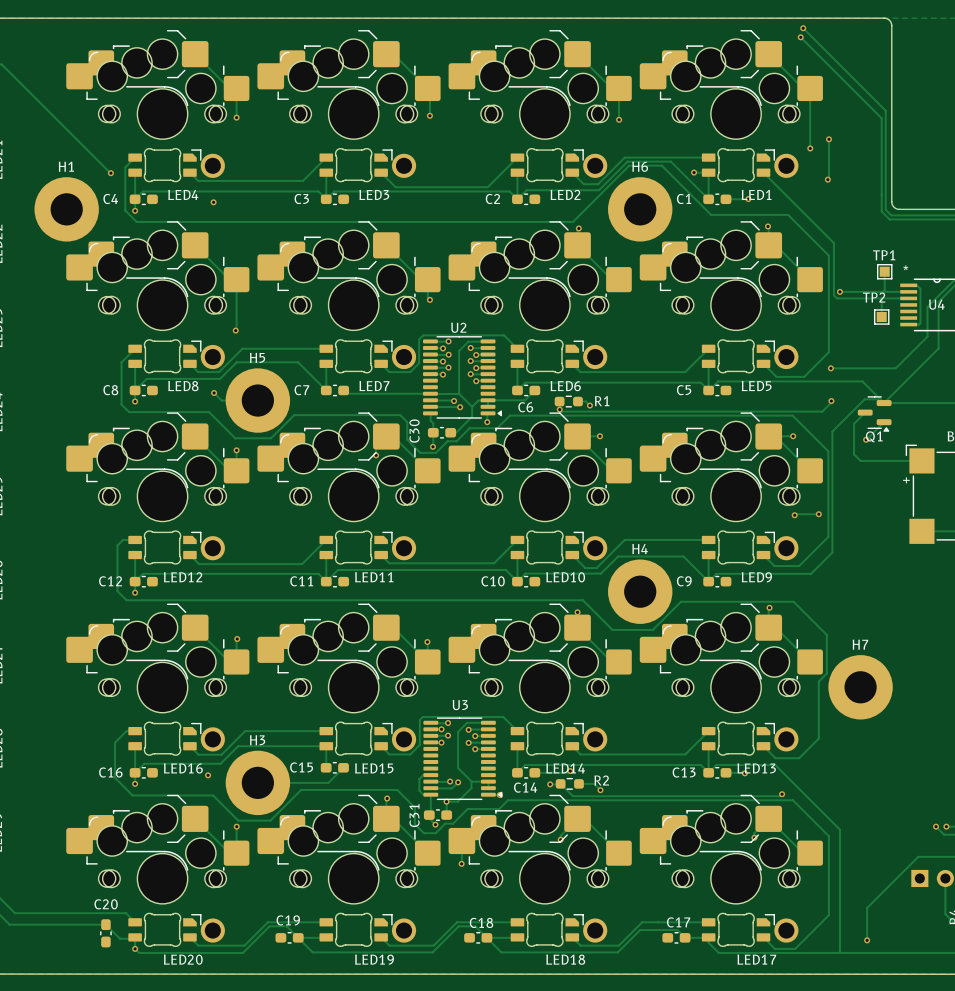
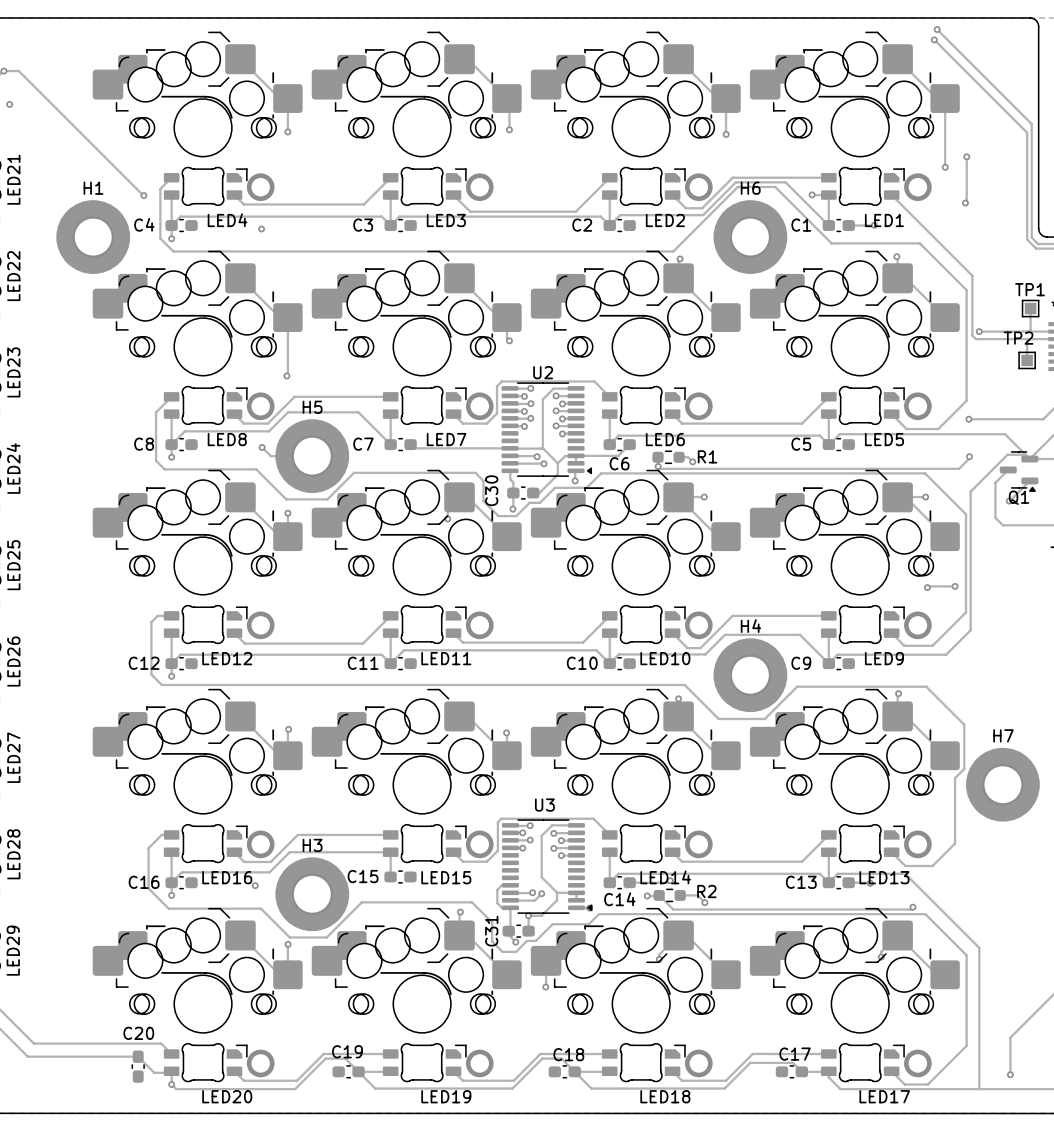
track: (343, 767) (328, 782) (257, 782) -> none

